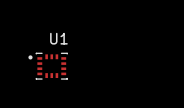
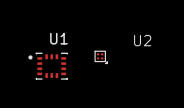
U2: none -> (101, 57)

